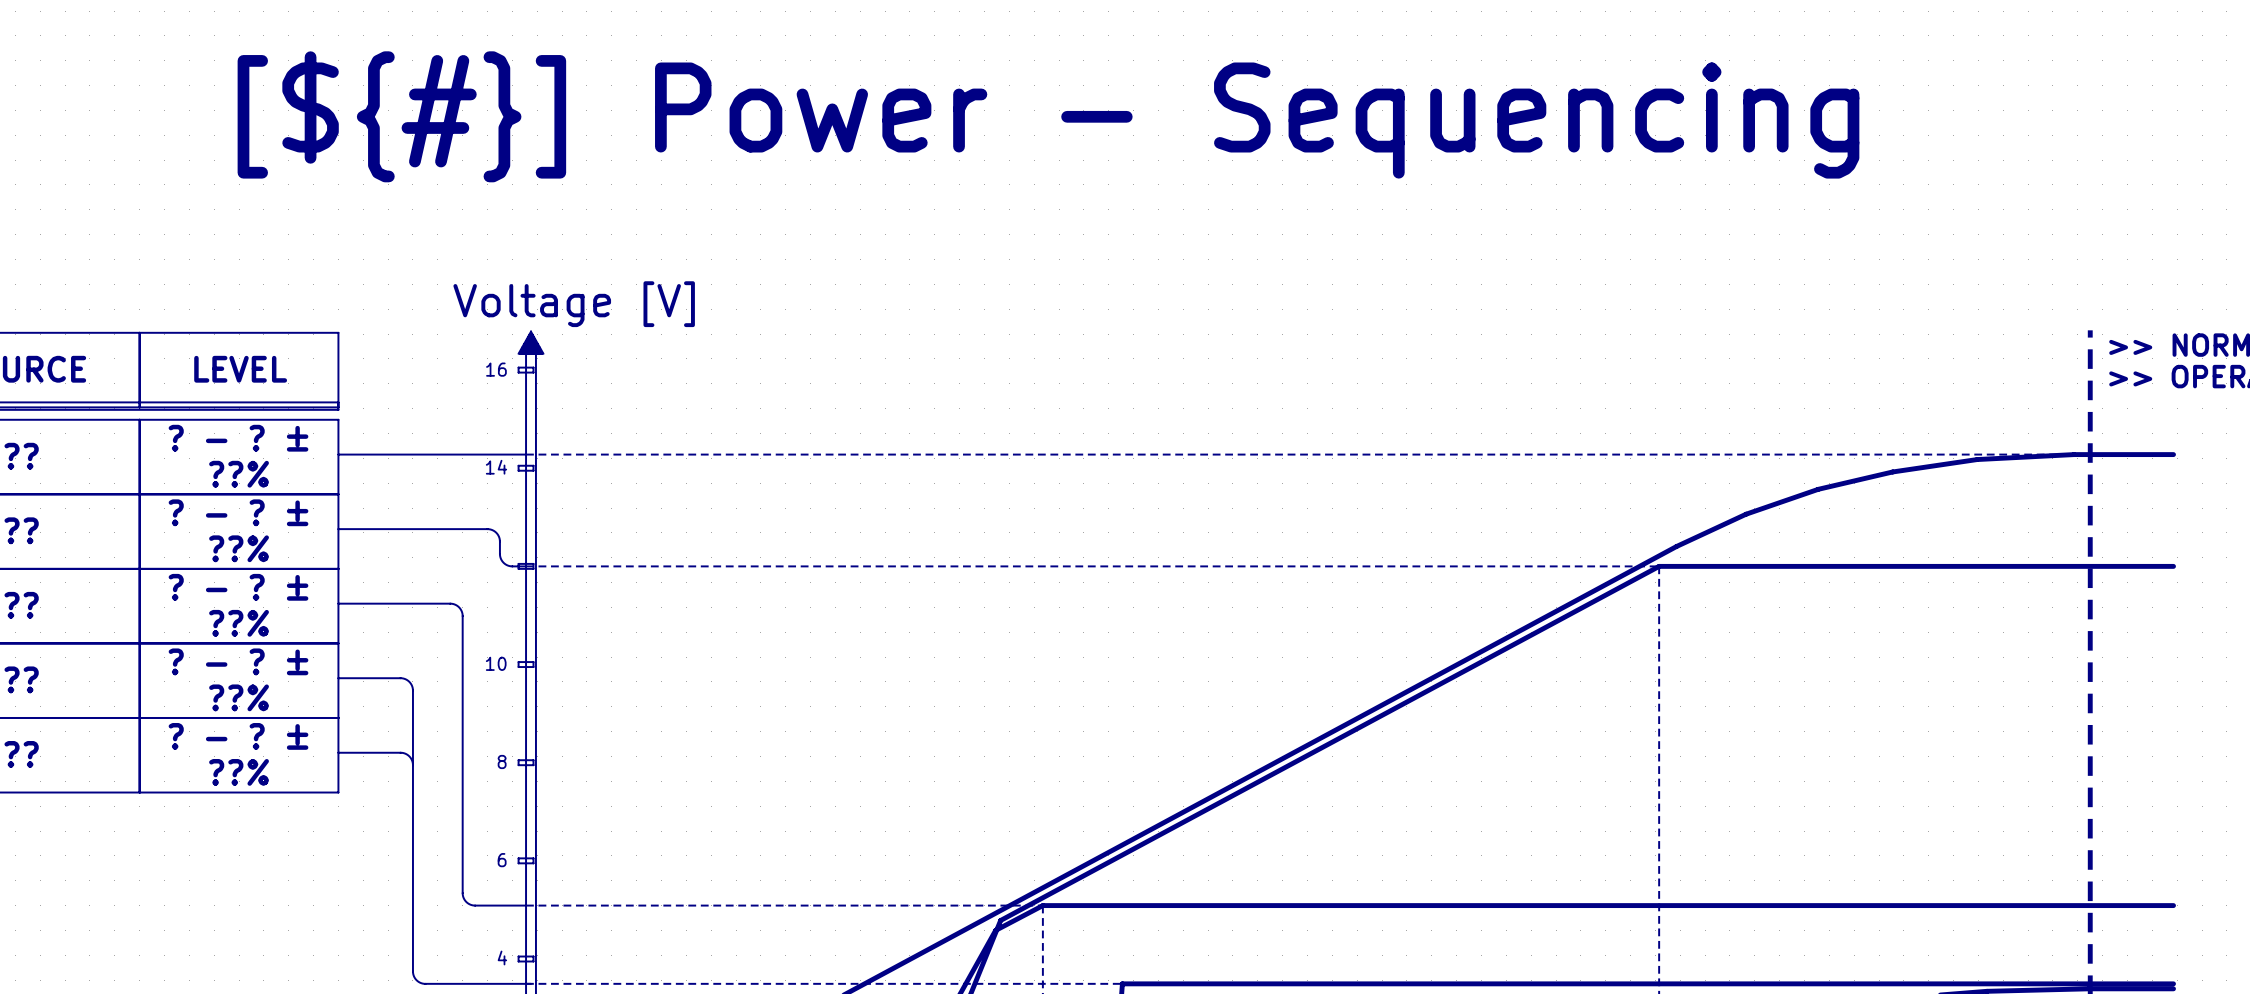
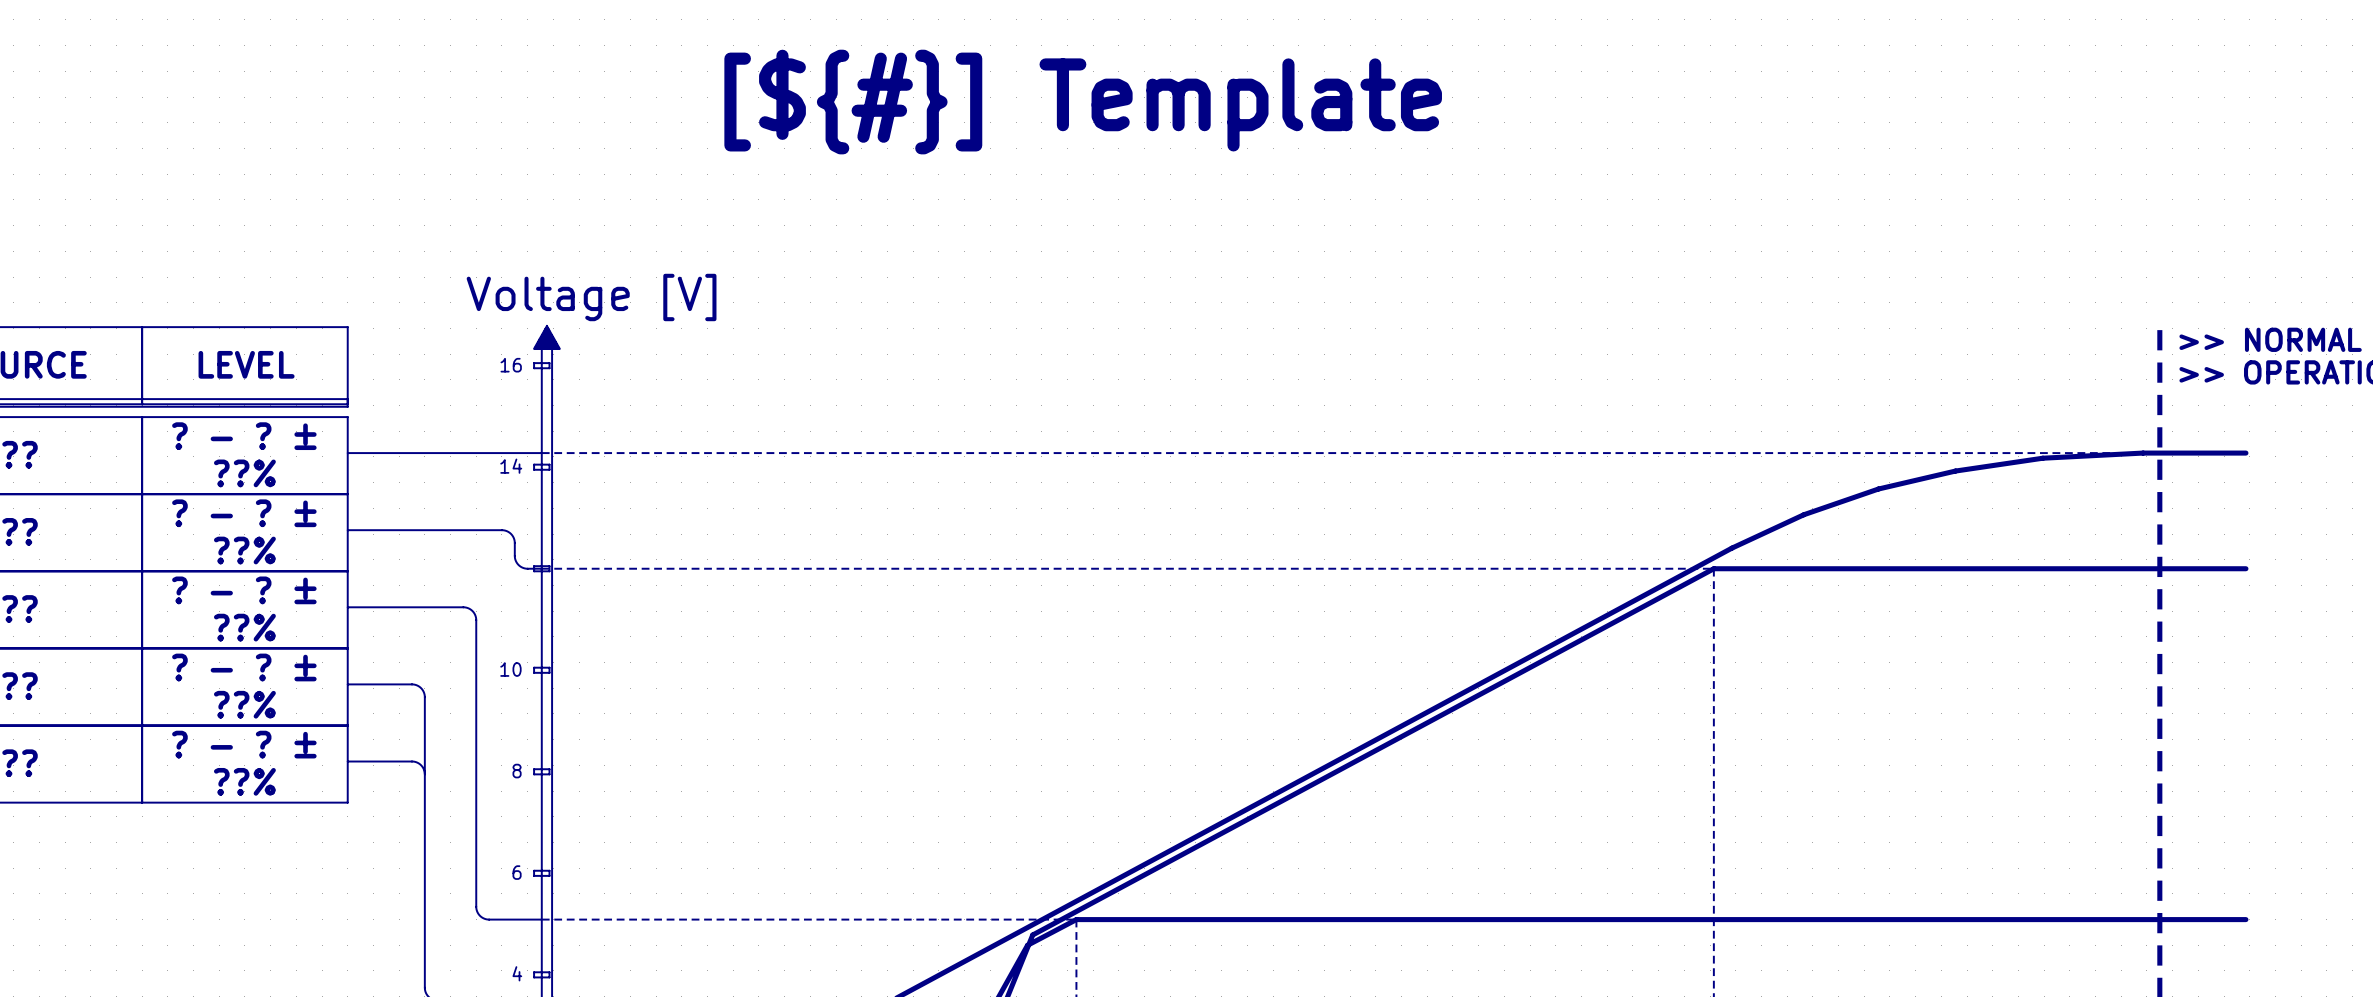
text: [${#}] Power - Sequencing (1048, 116) -> [${#}] Template (1083, 102)

